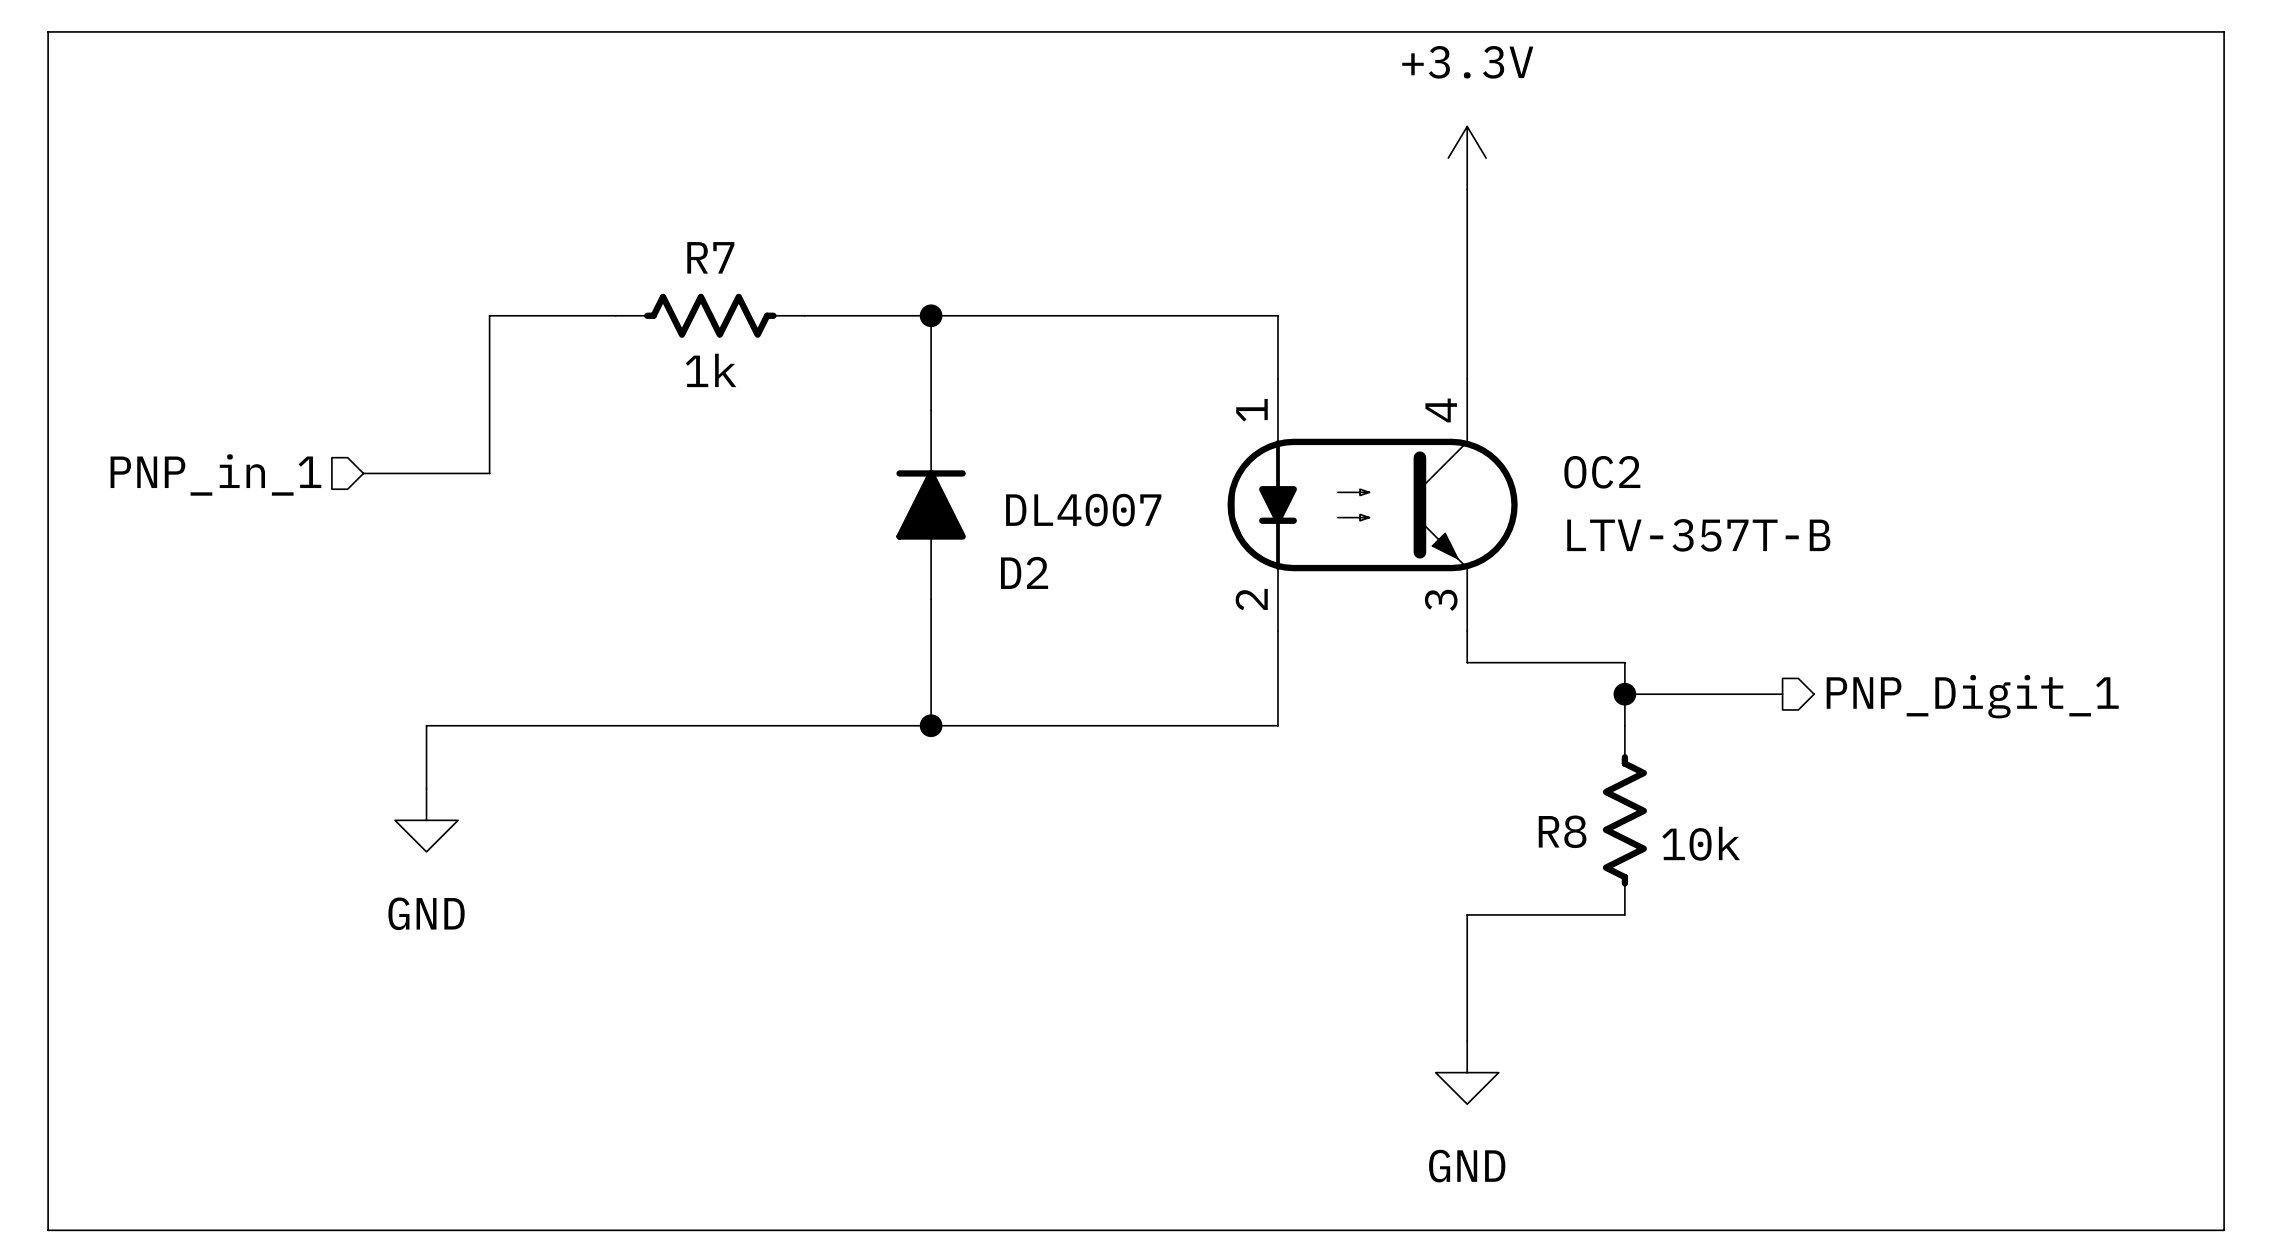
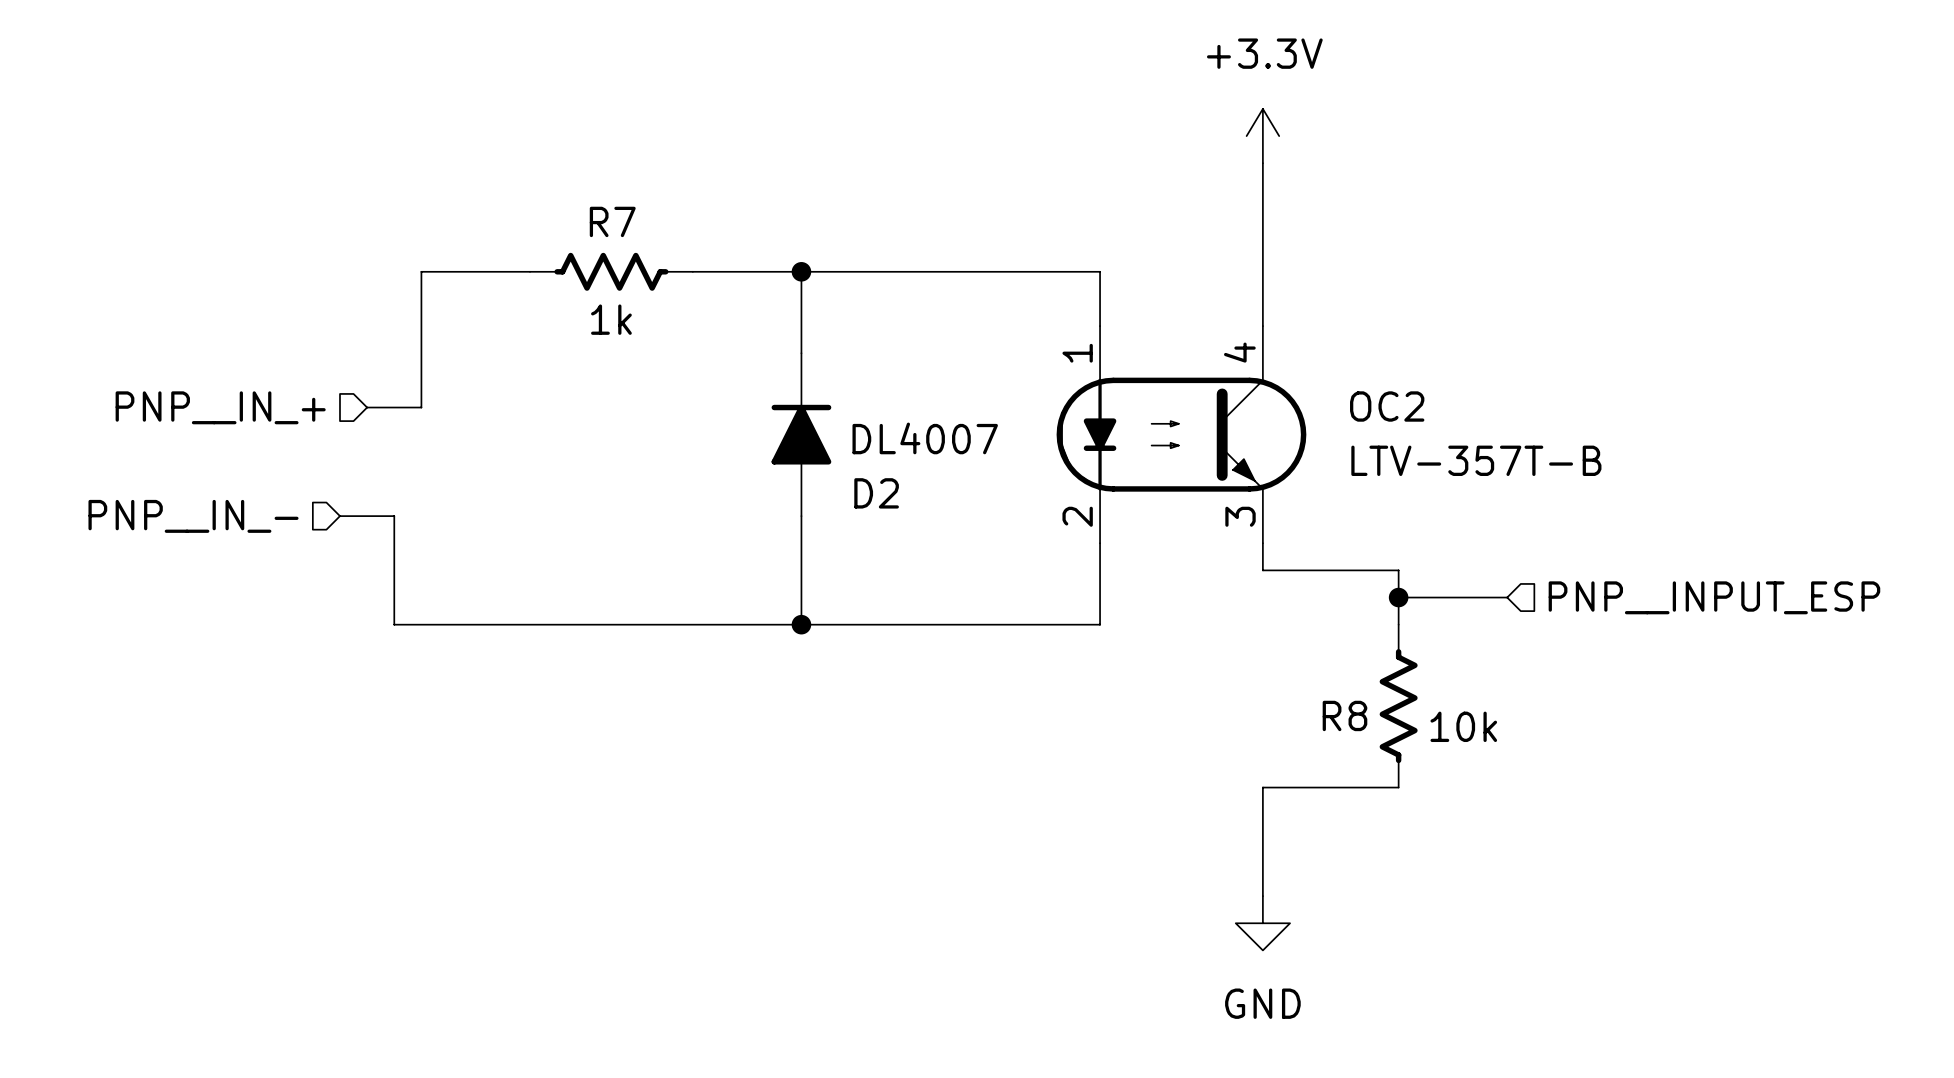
line: (48, 31) (2224, 31) (2224, 1230) (48, 1230) (48, 31) -> none
wire: (363, 473) (426, 473) -> none
hierarchical label: PNP_in_1 (215, 474) -> none
hierarchical label: none -> PNP__IN_+ (220, 407)
hierarchical label: none -> PNP__IN_- (193, 516)
wire: (1751, 694) (1782, 694) -> none
hierarchical label: PNP_Digit_1 (1972, 696) -> none
hierarchical label: none -> PNP__INPUT_ESP (1714, 597)
wire: (458, 725) (426, 725) (426, 788) -> (394, 624) (394, 516) (339, 516)
power symbol: GND (426, 820) -> none

